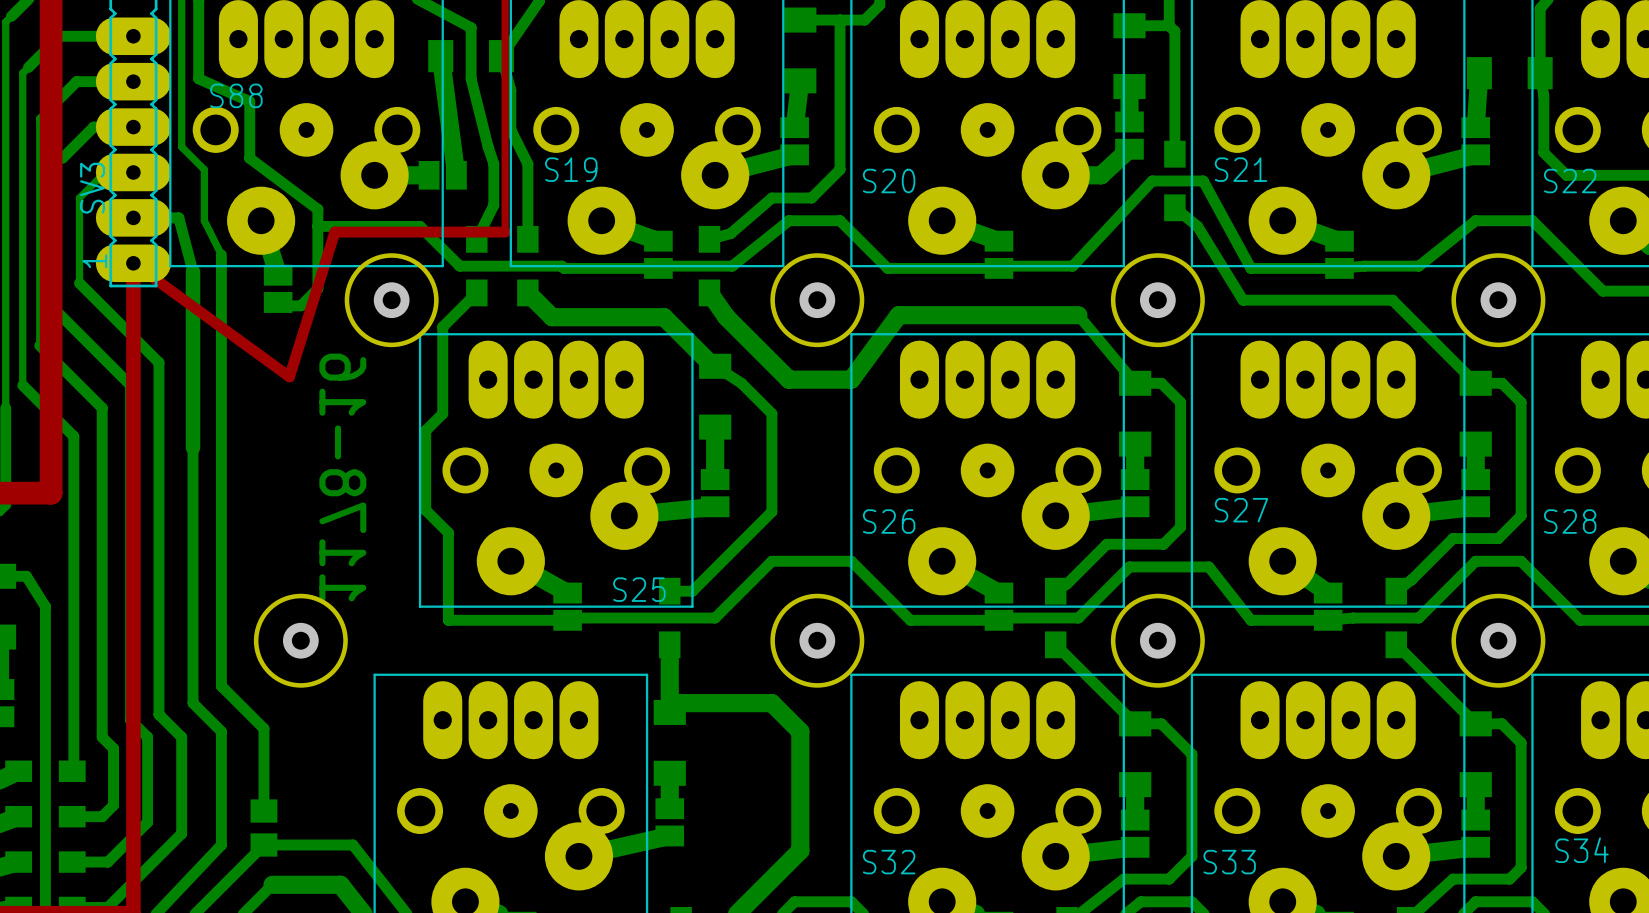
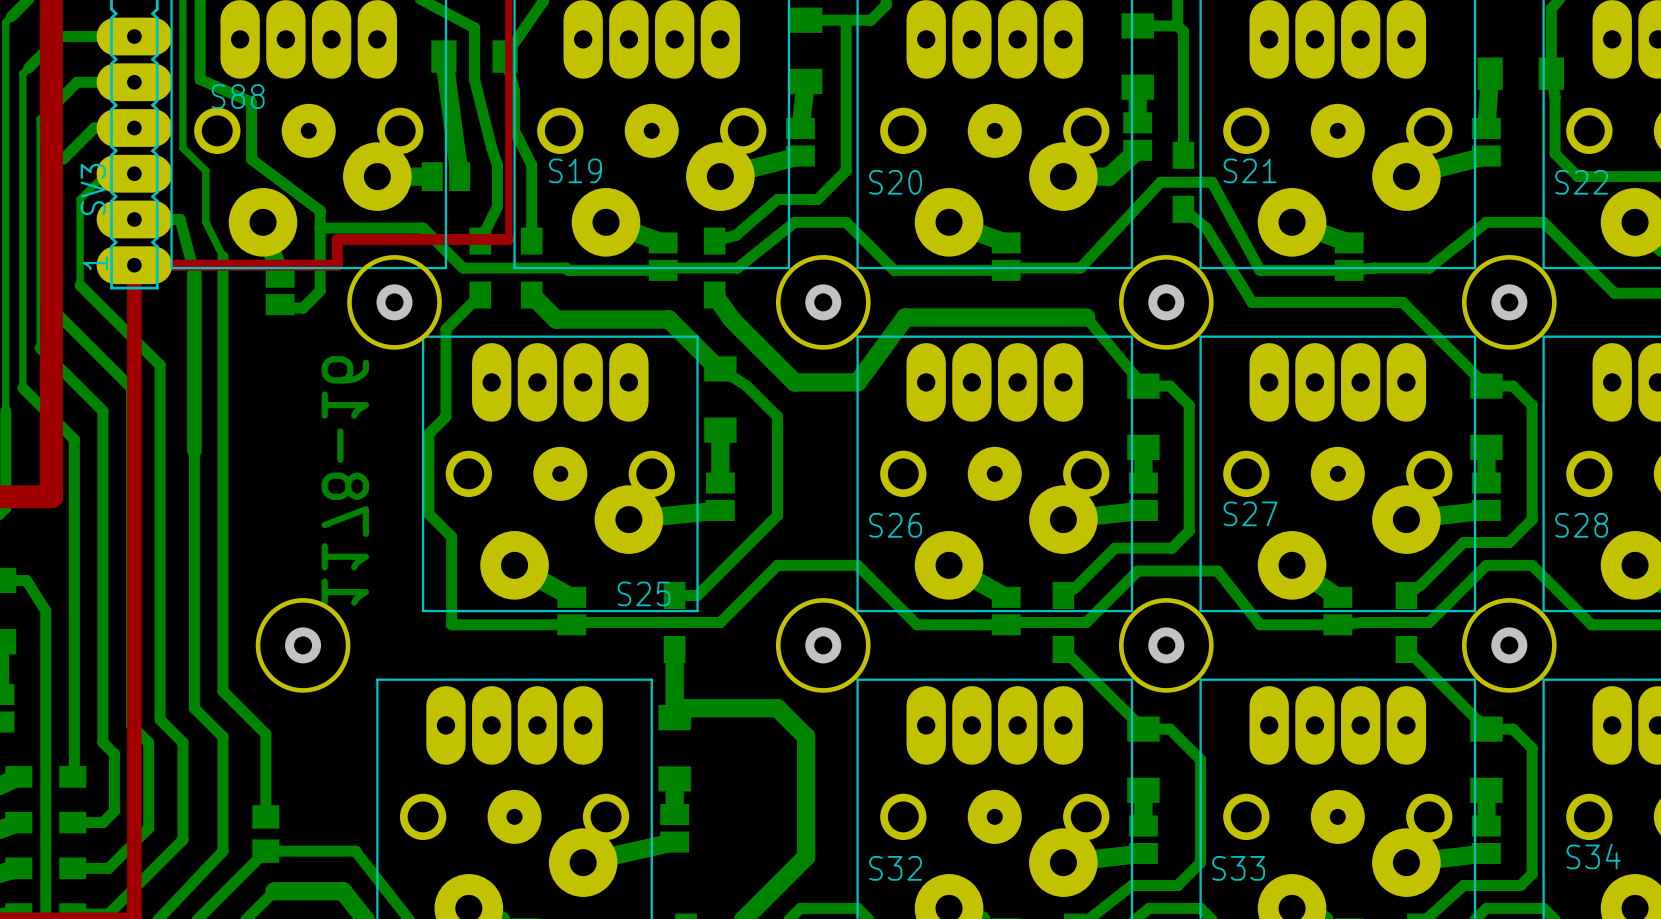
top track: (505, 232) (334, 232) (289, 376) (133, 263) -> (508, 233) (508, 239) (337, 239) (337, 265) (134, 265)

